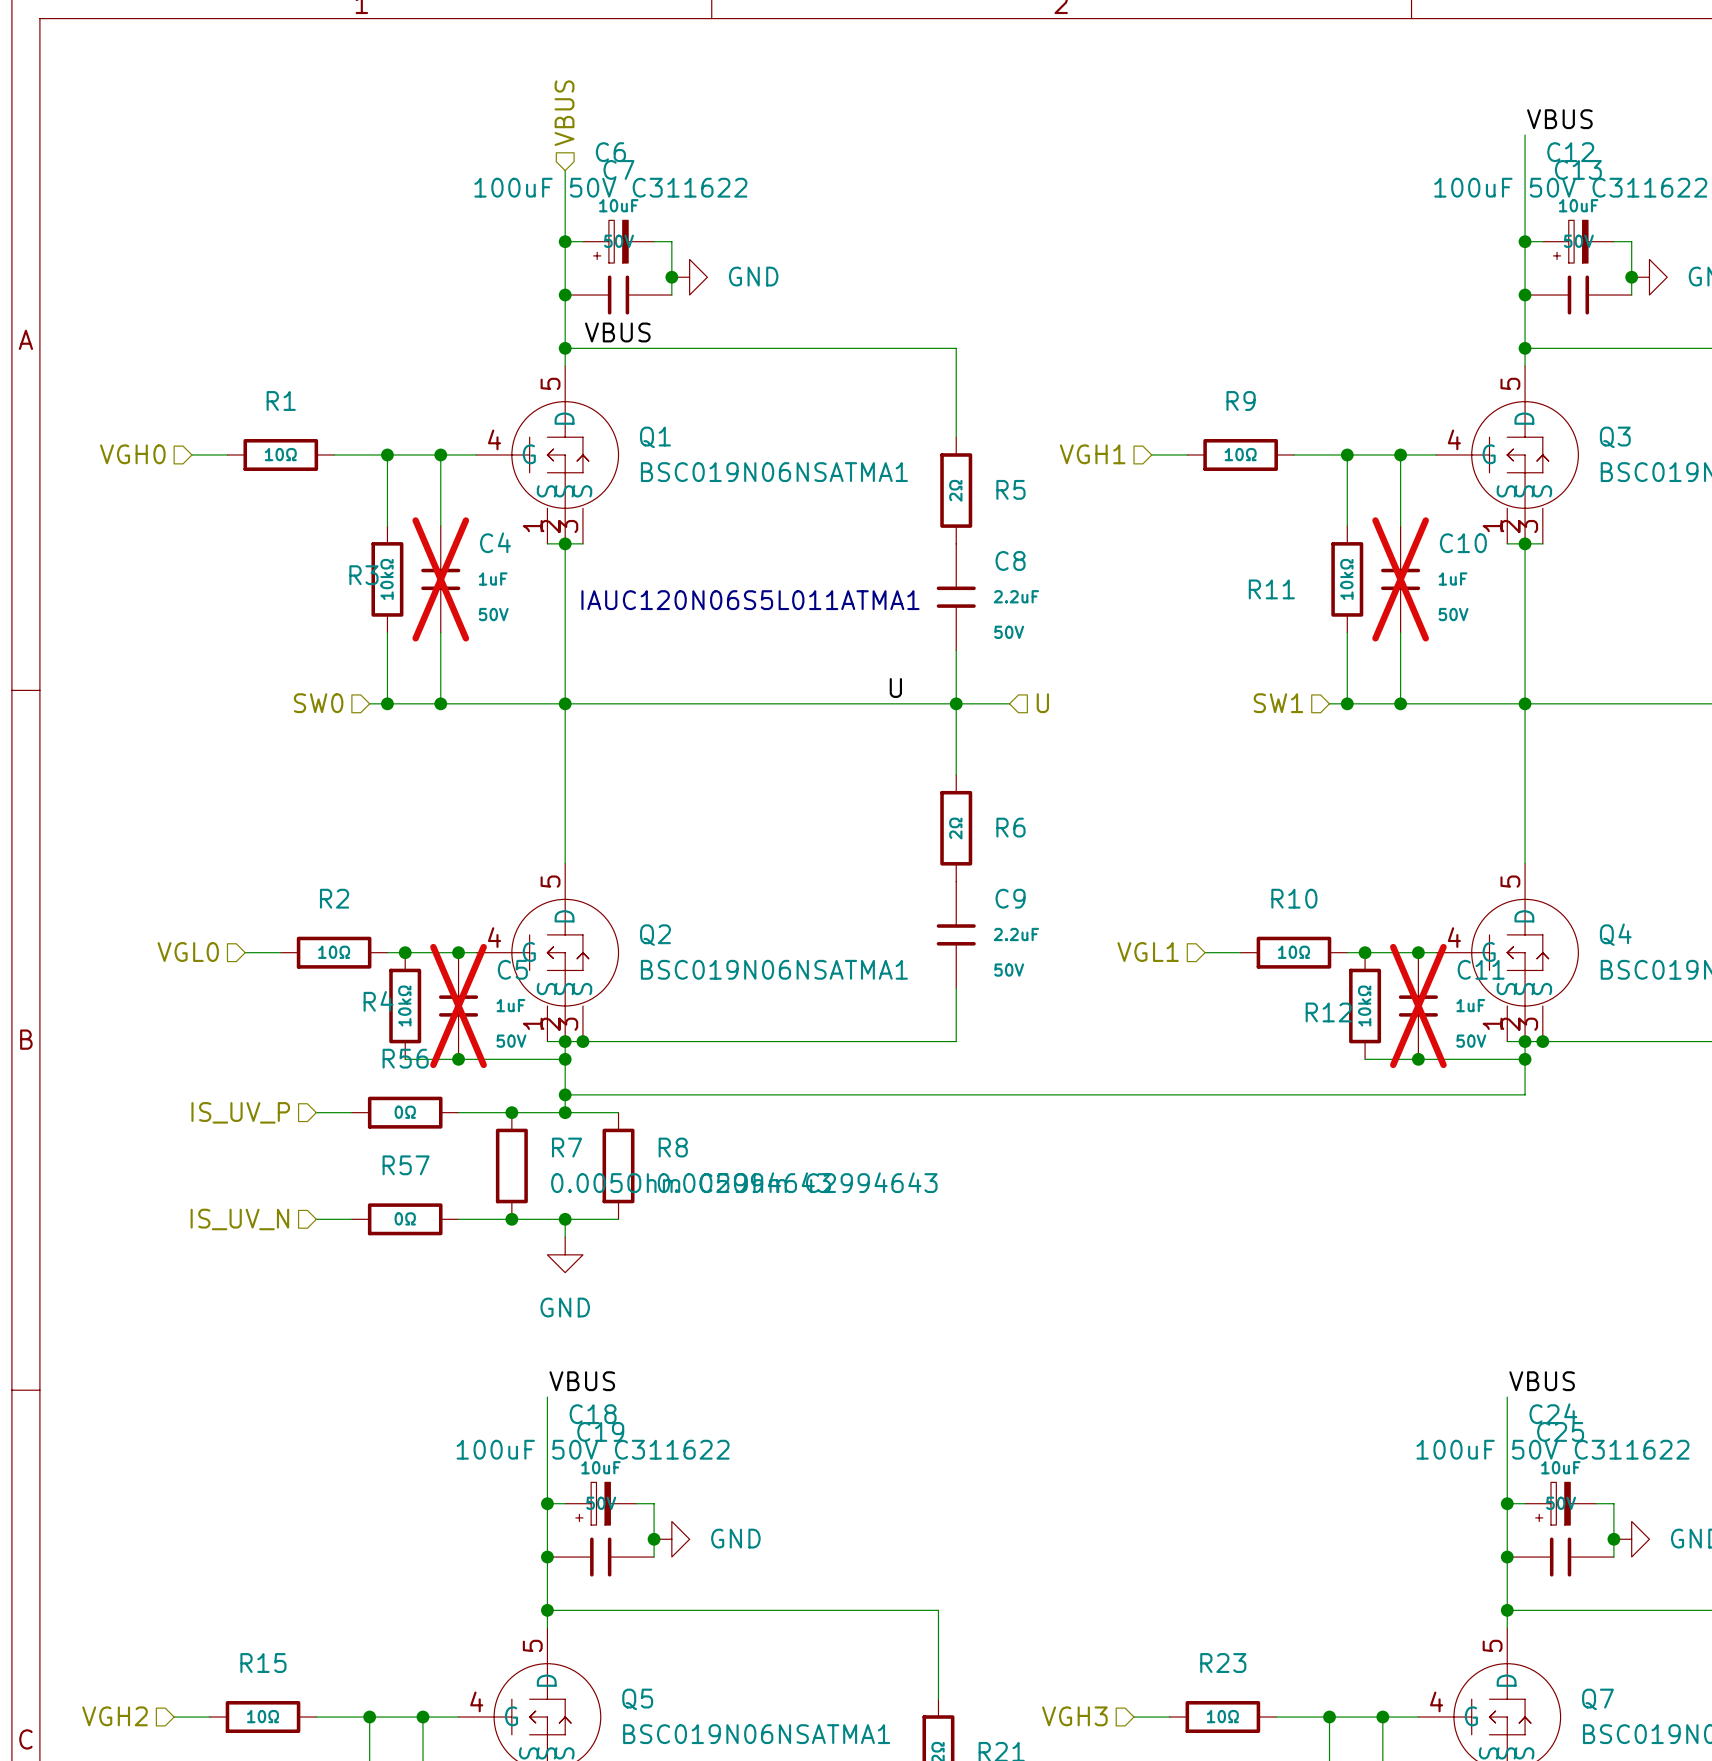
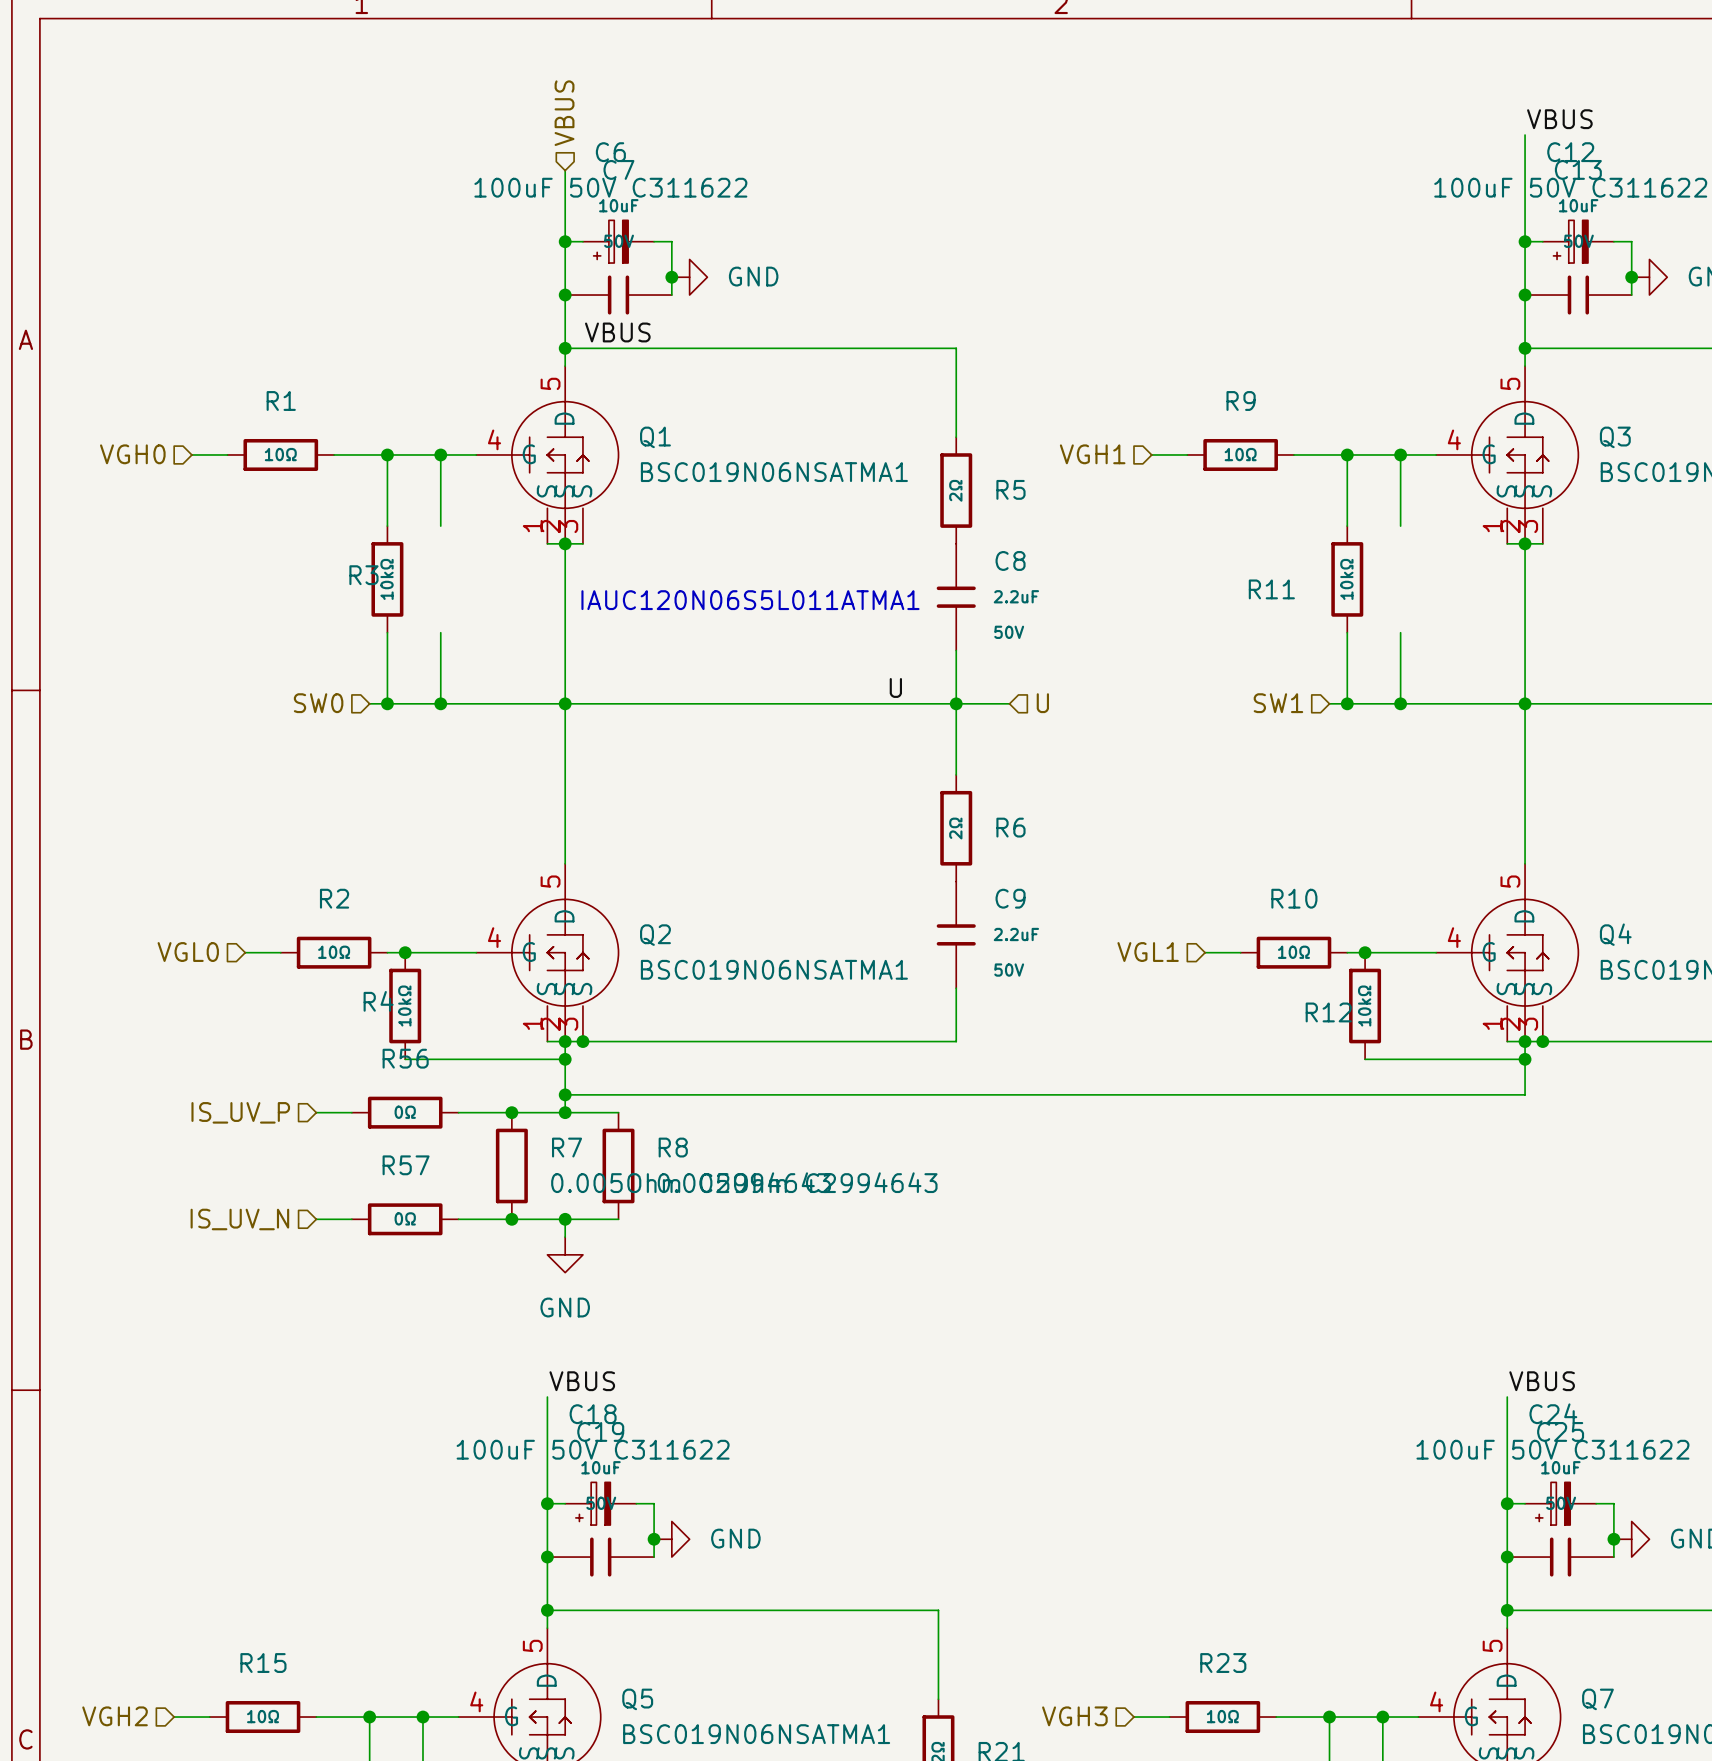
C4: 1uF (440, 579) -> none
C10: 1uF (1400, 579) -> none
junction: (458, 952) -> none
junction: (1418, 952) -> none
C5: 1uF (458, 1006) -> none
C11: 1uF (1418, 1006) -> none
junction: (458, 1059) -> none
junction: (1418, 1059) -> none

